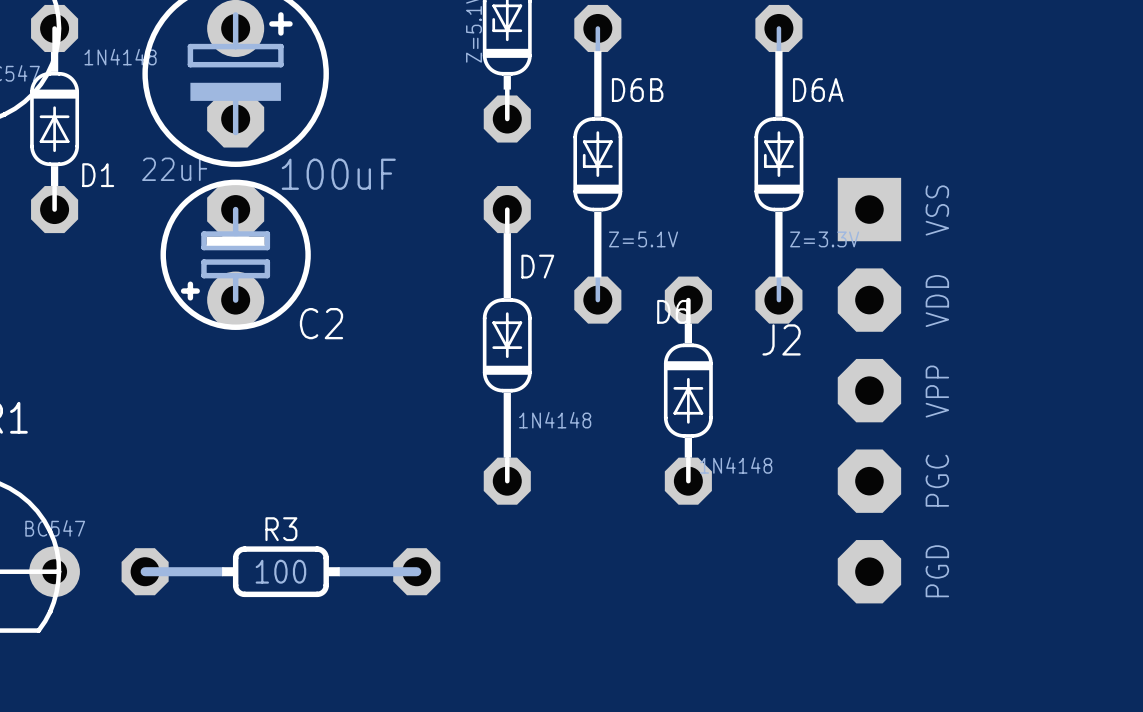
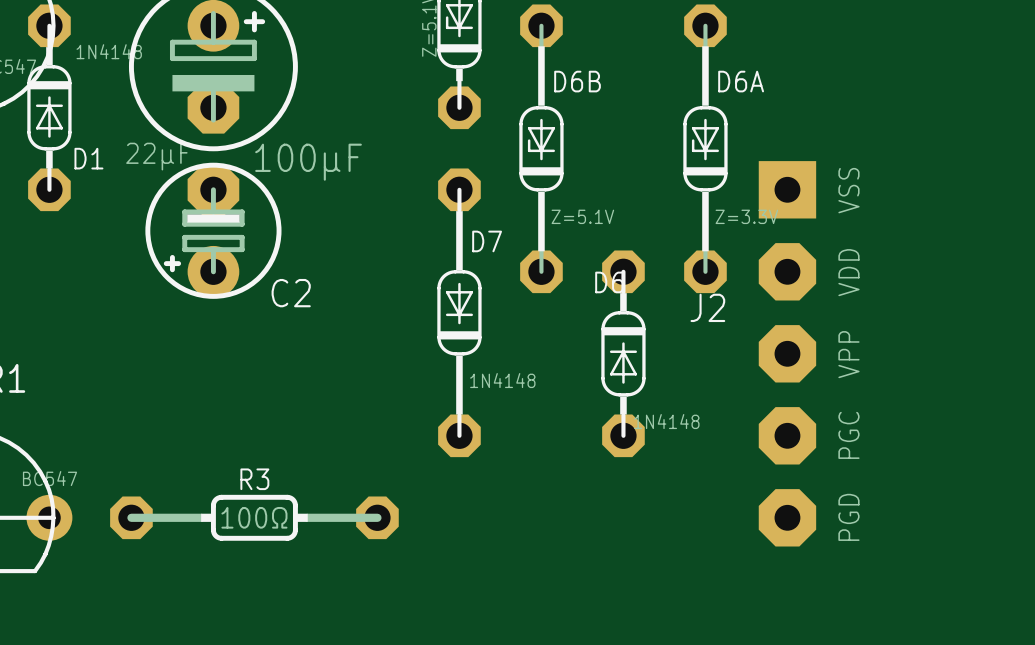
C2 value: 22uF (176, 169) -> 22μF (158, 156)
part value: 100uF (338, 174) -> 100μF (308, 162)
R3 value: 100 (280, 571) -> 100Ω (254, 517)

